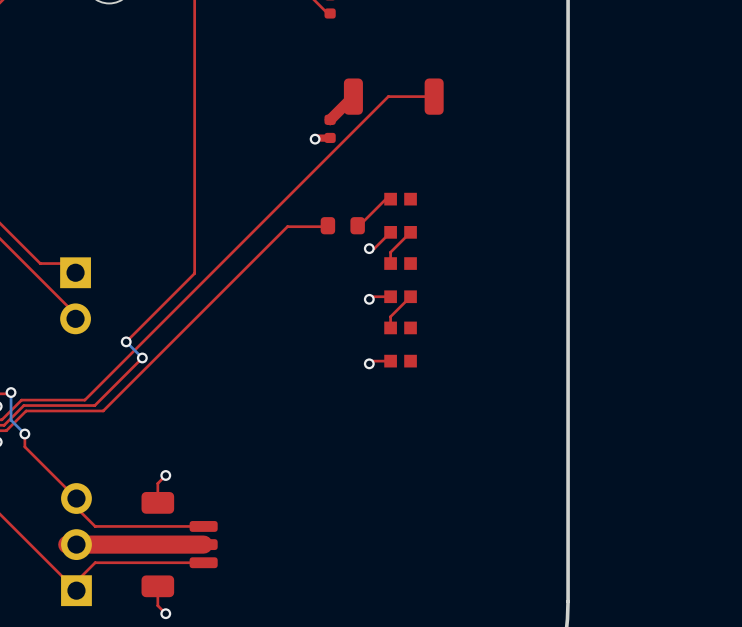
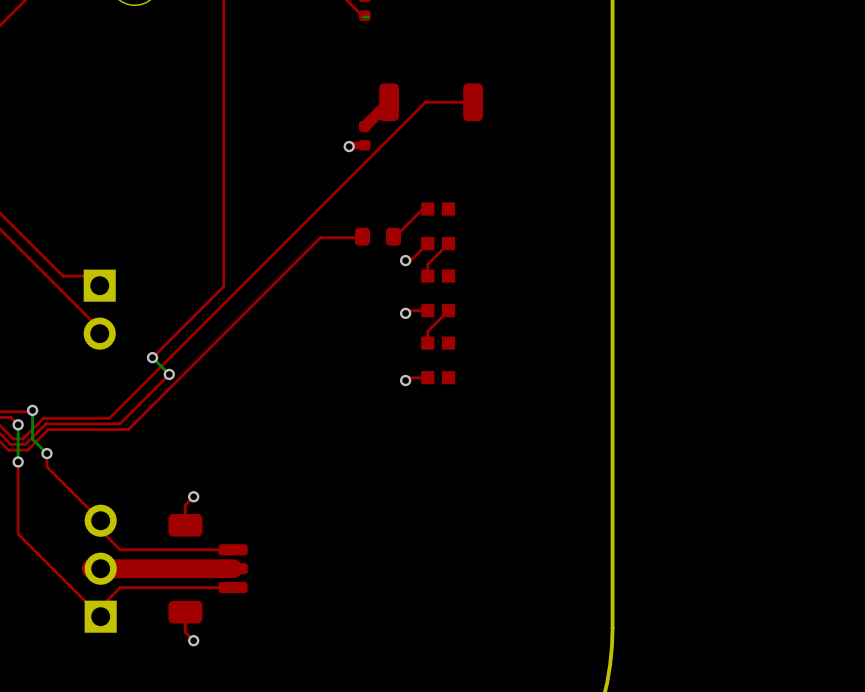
bottom track: none -> (368, 17) (363, 17)

